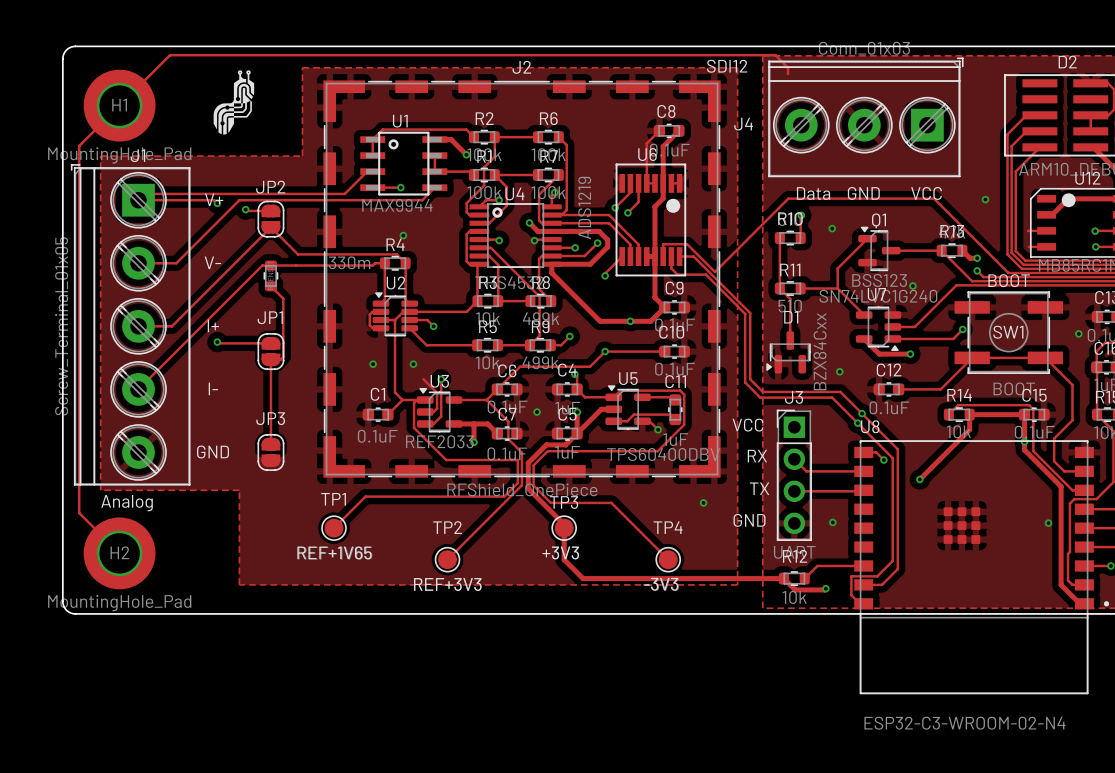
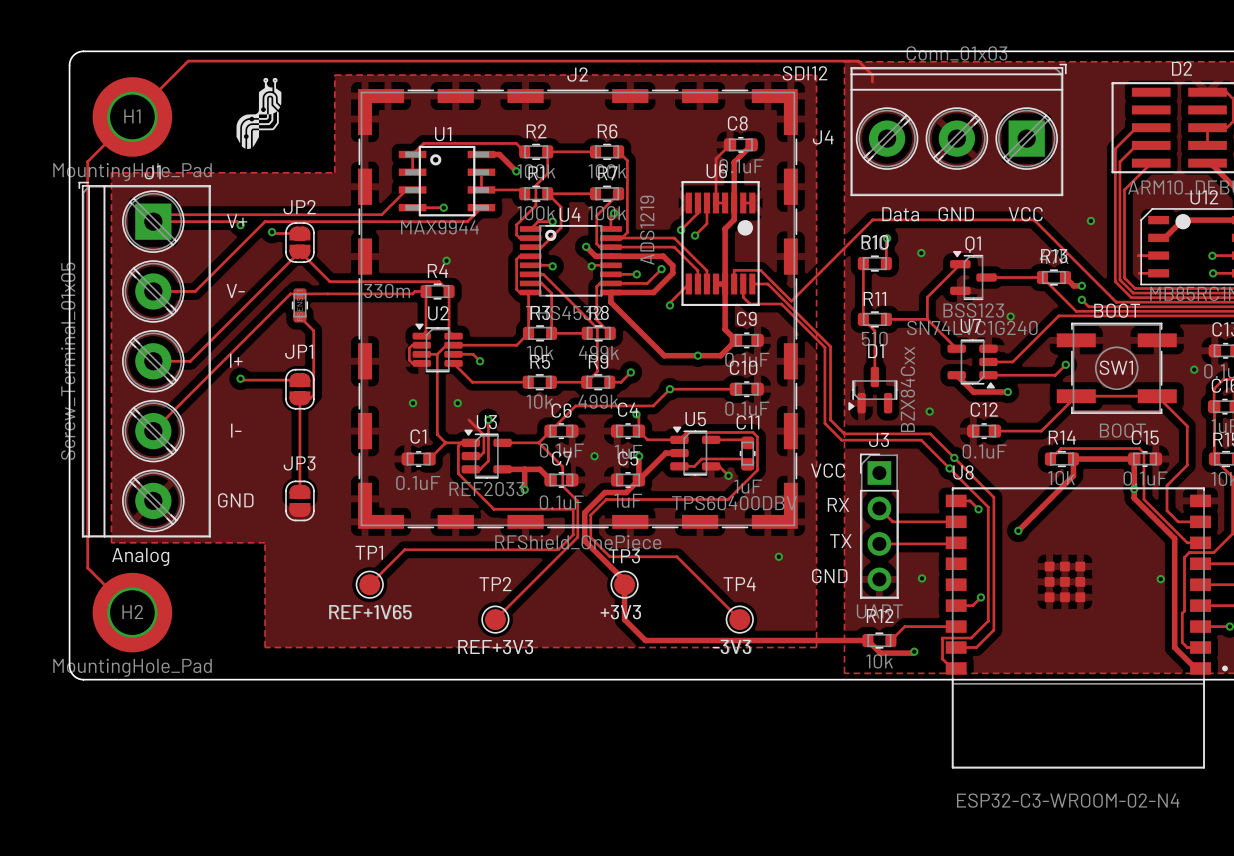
track: none -> (980, 597) (972, 605) (956, 605)
via: none -> (980, 597)

